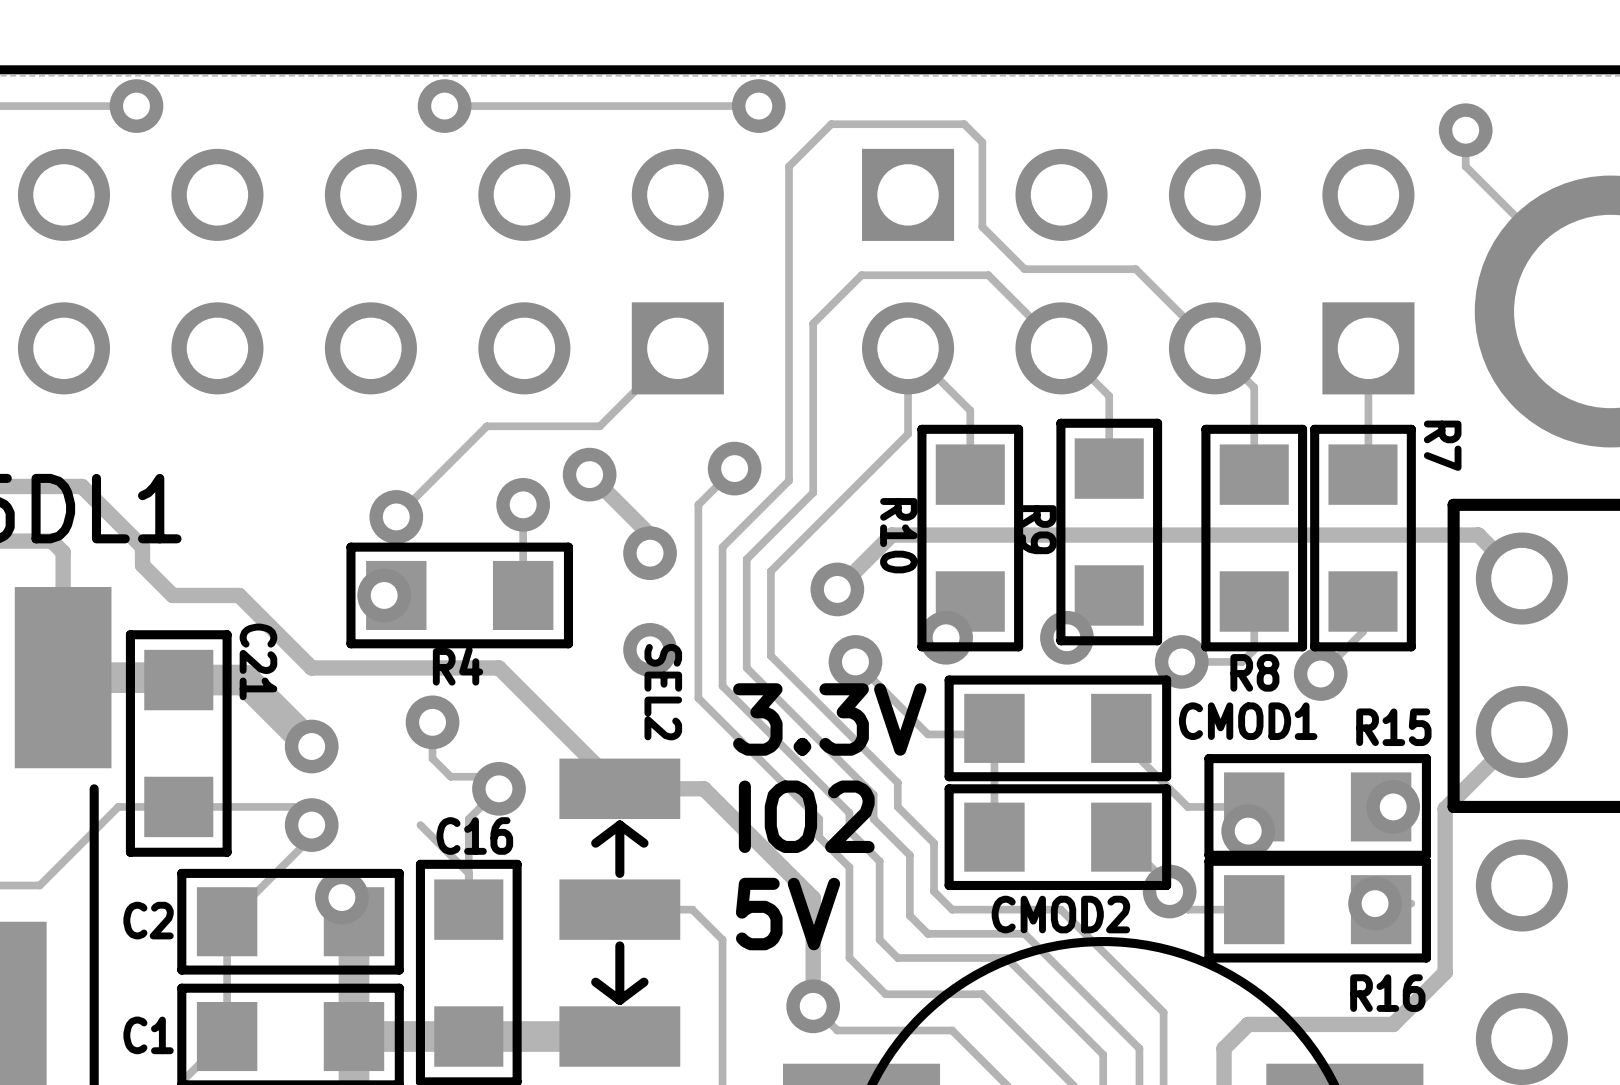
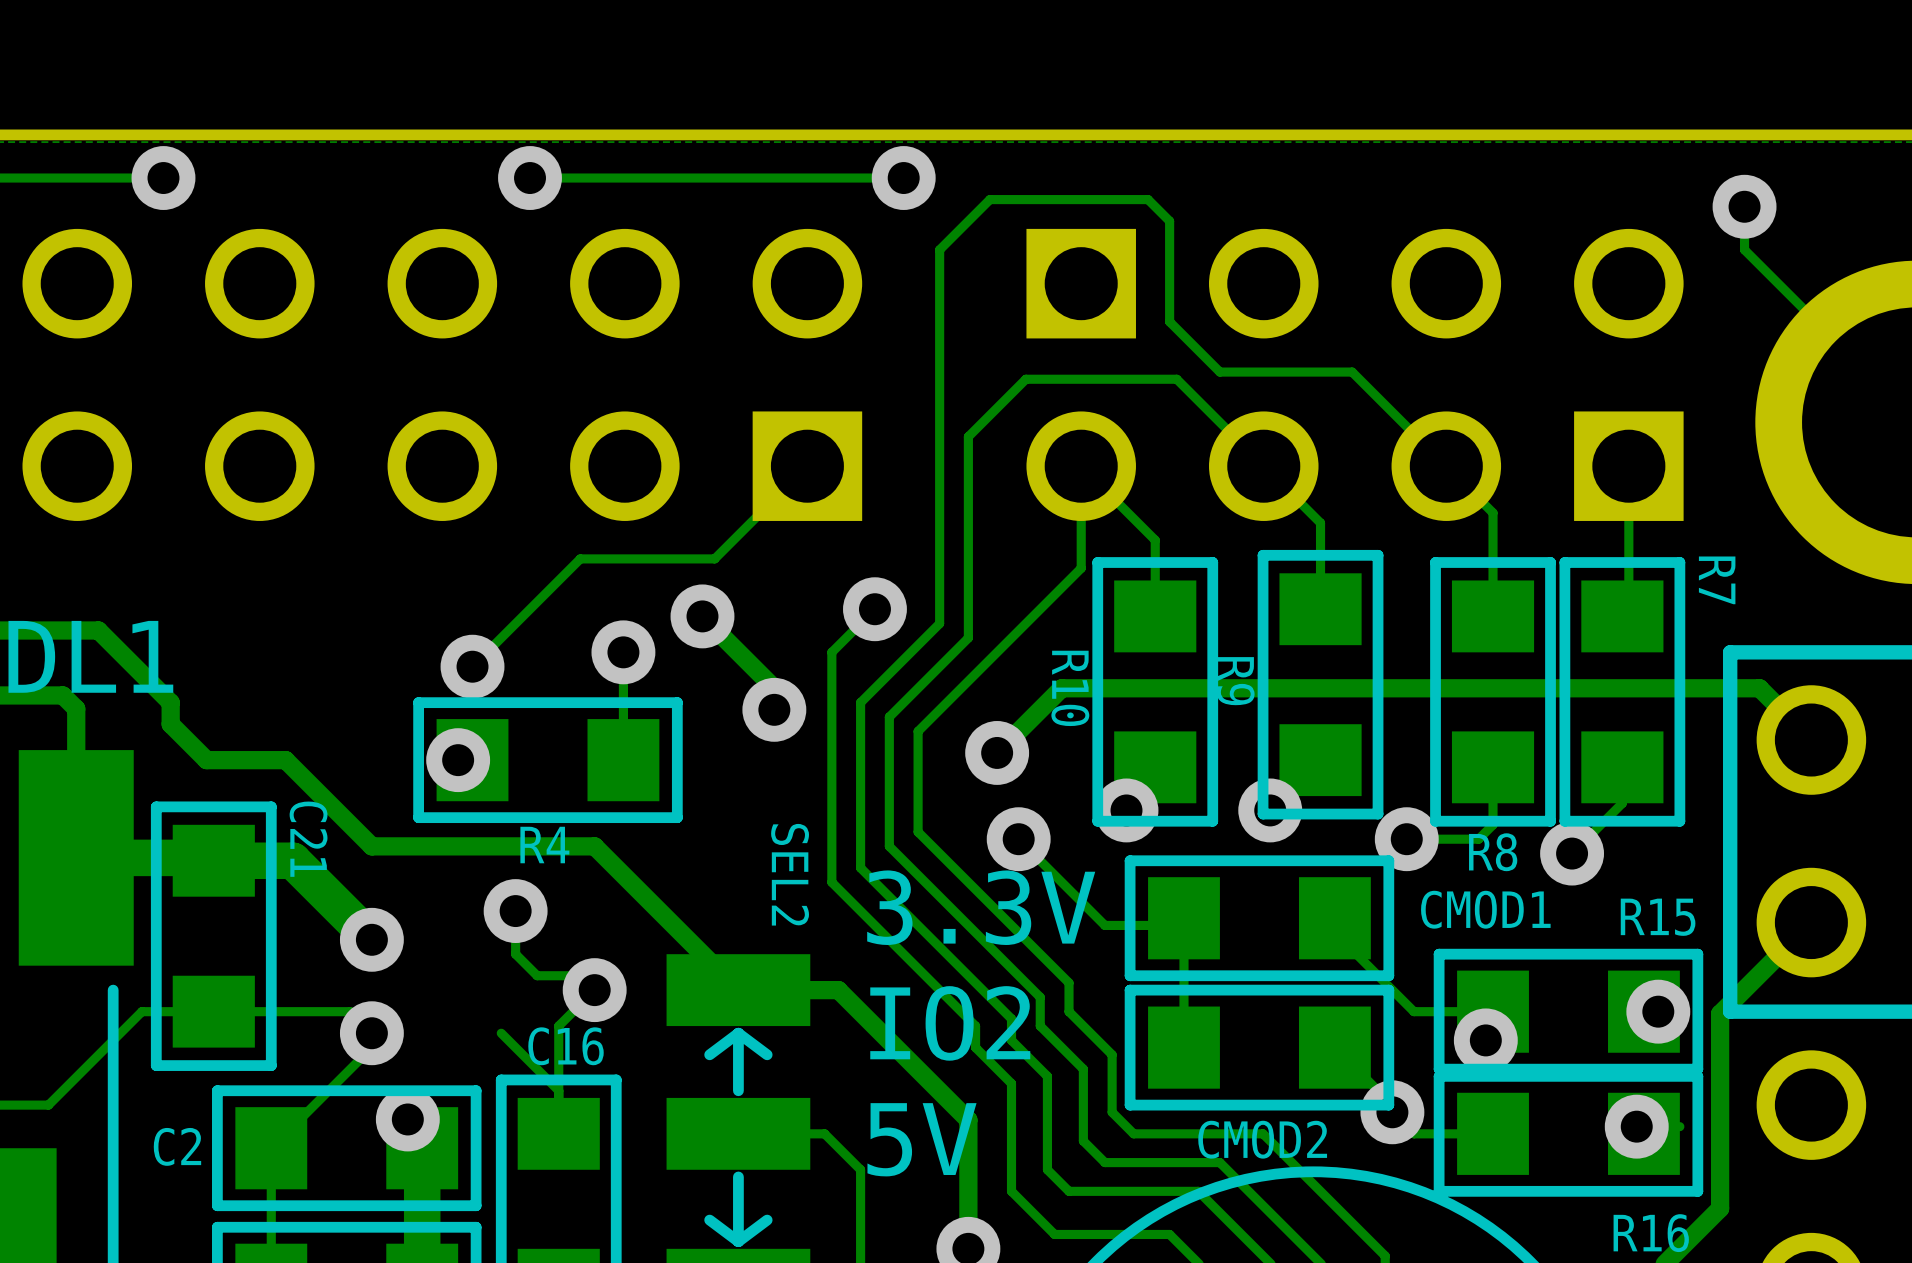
via: (650, 649) -> none

